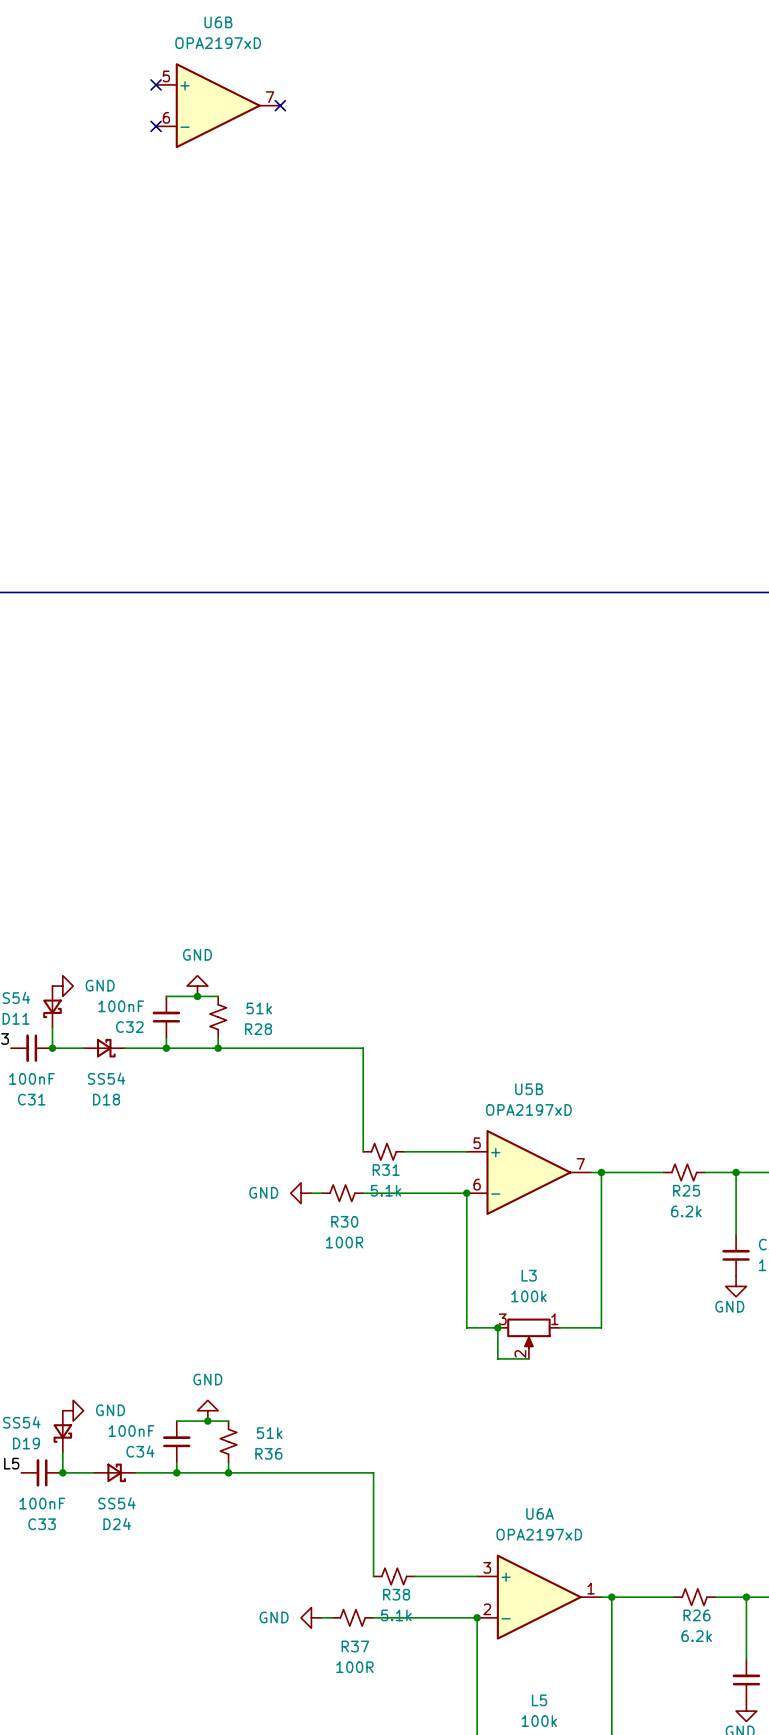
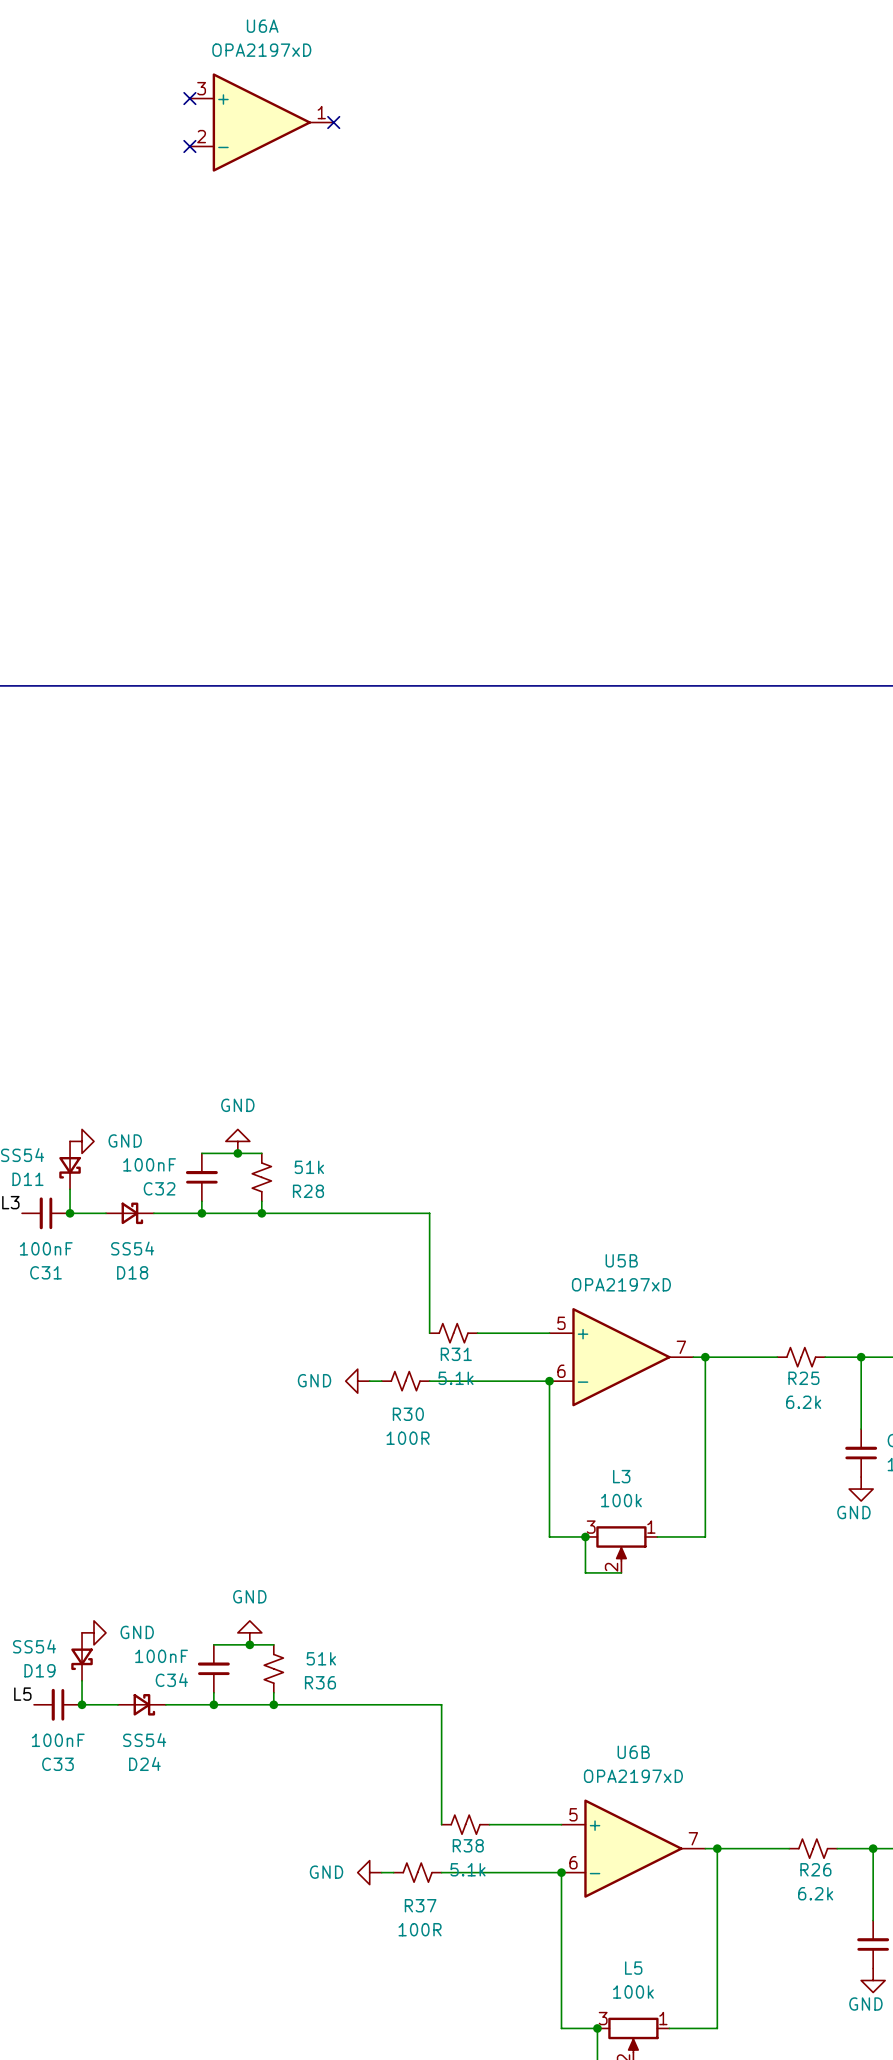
U6B position: (218, 105) -> (633, 1848)
U6A position: (539, 1597) -> (261, 122)

